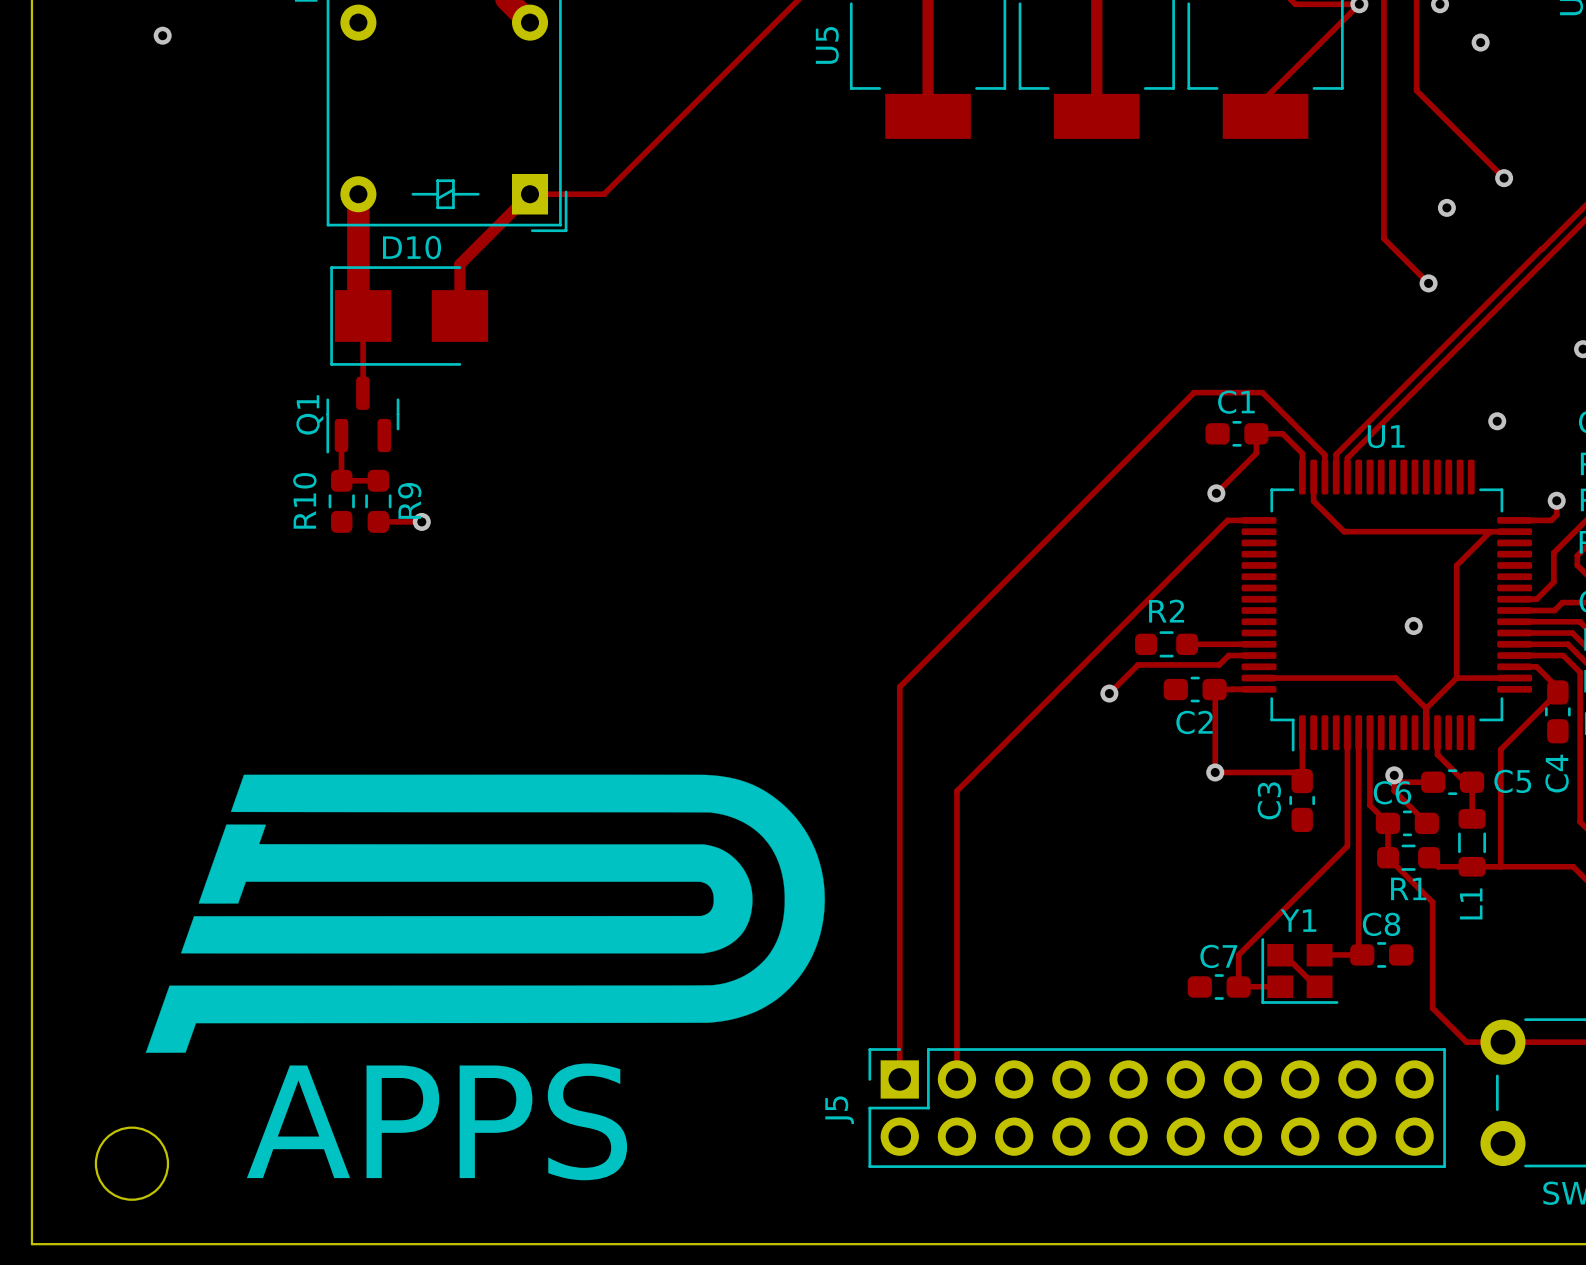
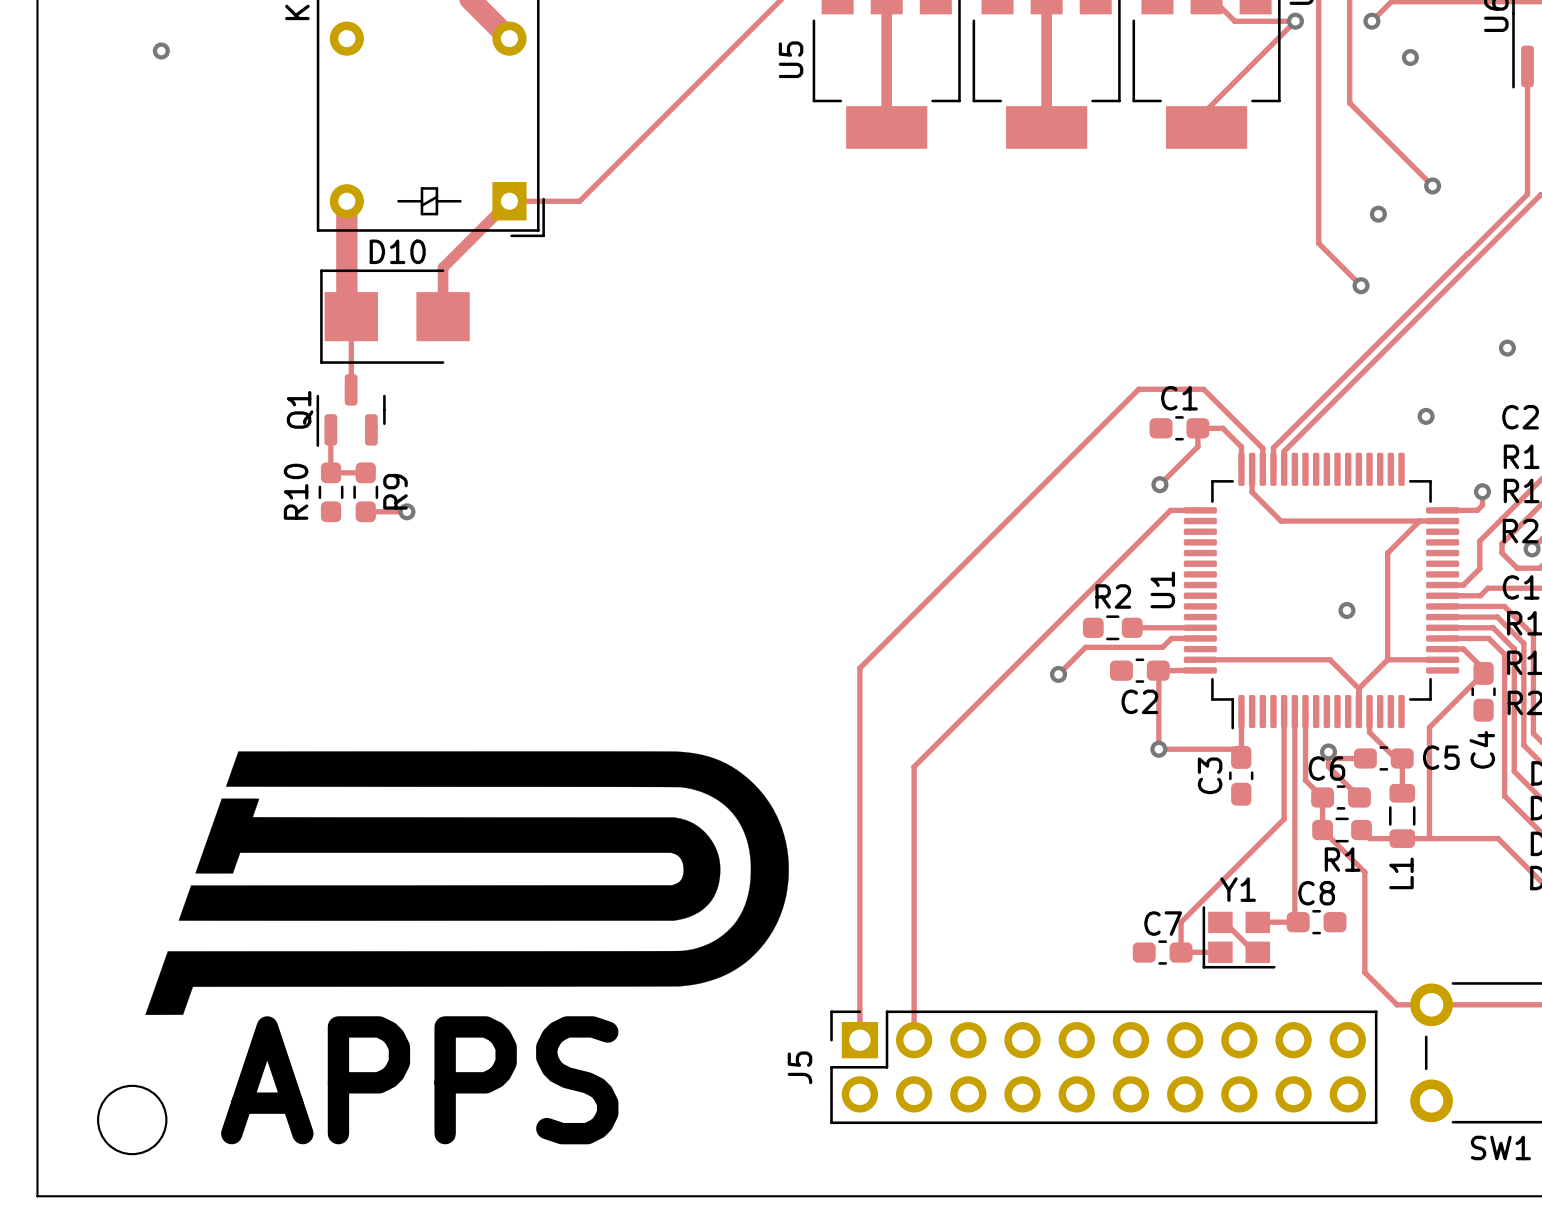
U1 name rotation: 0° (1386, 436) -> 90° counterclockwise (1162, 589)
U1 name position: U1 (1386, 436) -> U1 (1162, 589)

